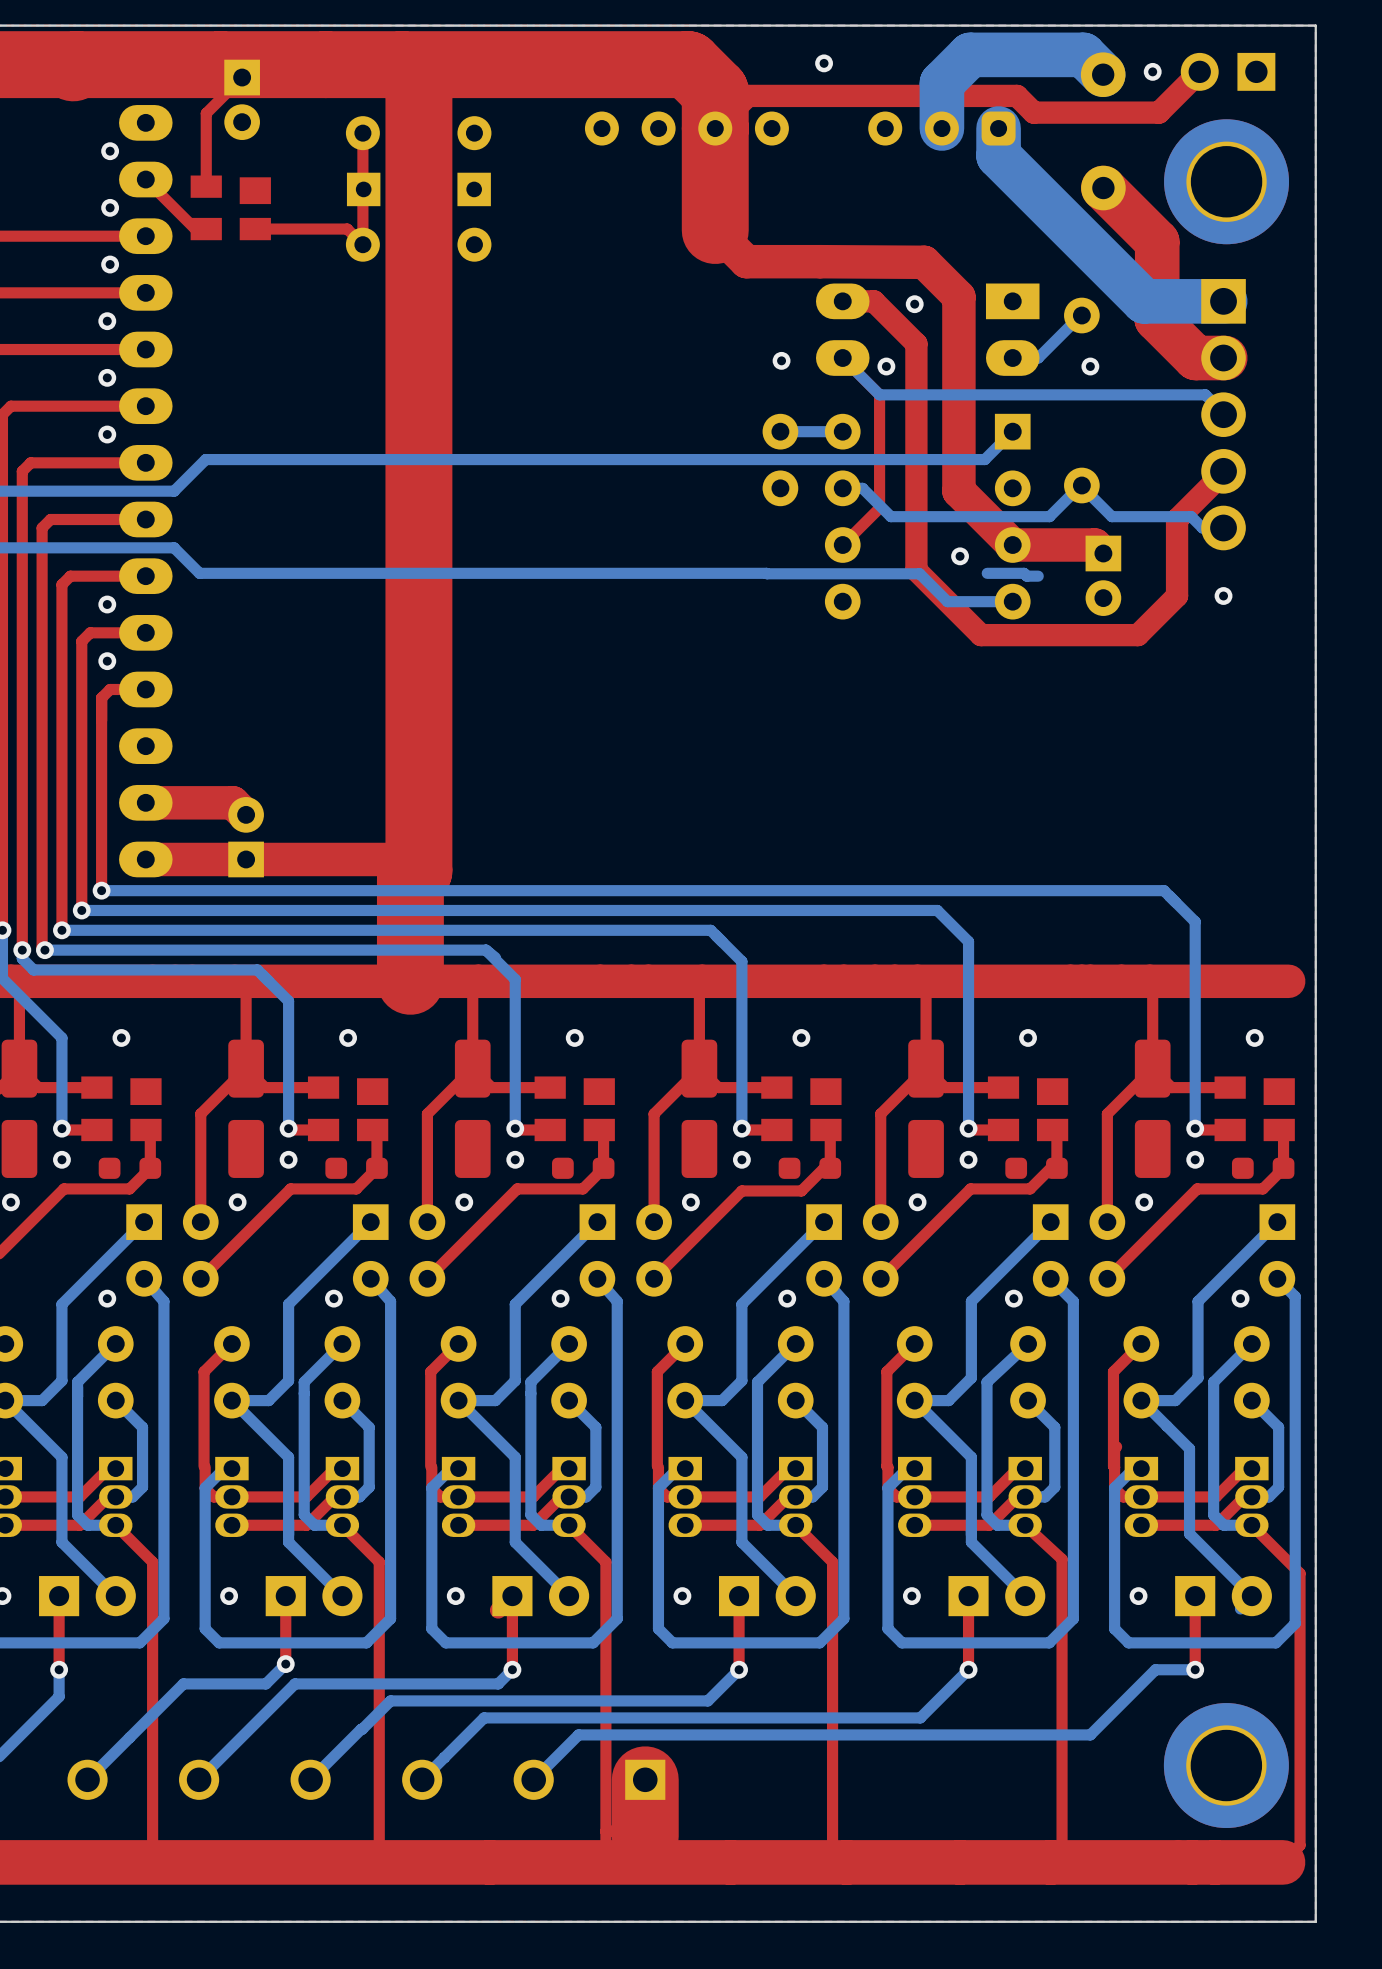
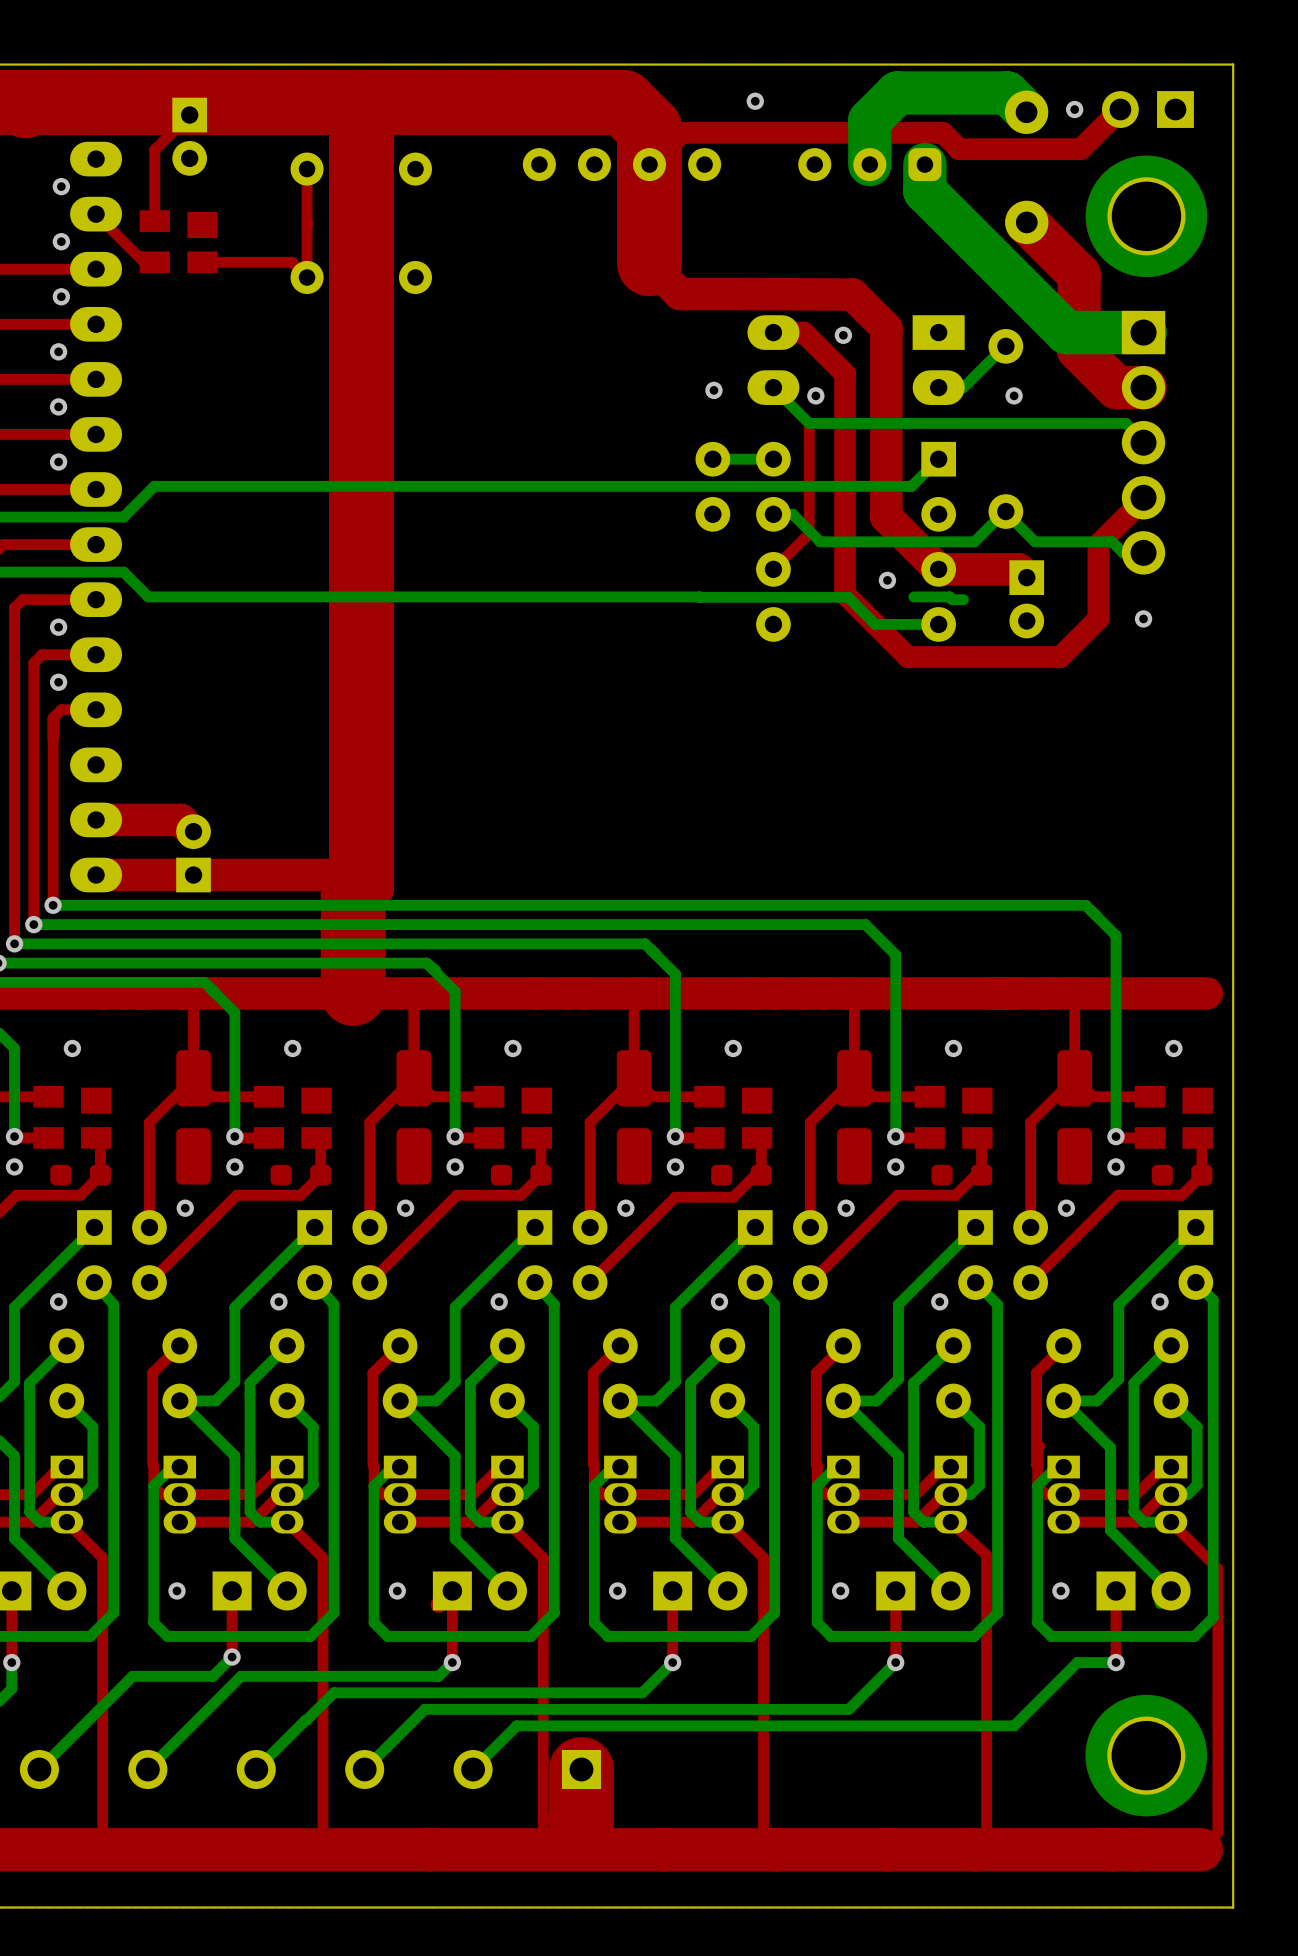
part: (363, 189) -> none
part: (474, 189) -> none

